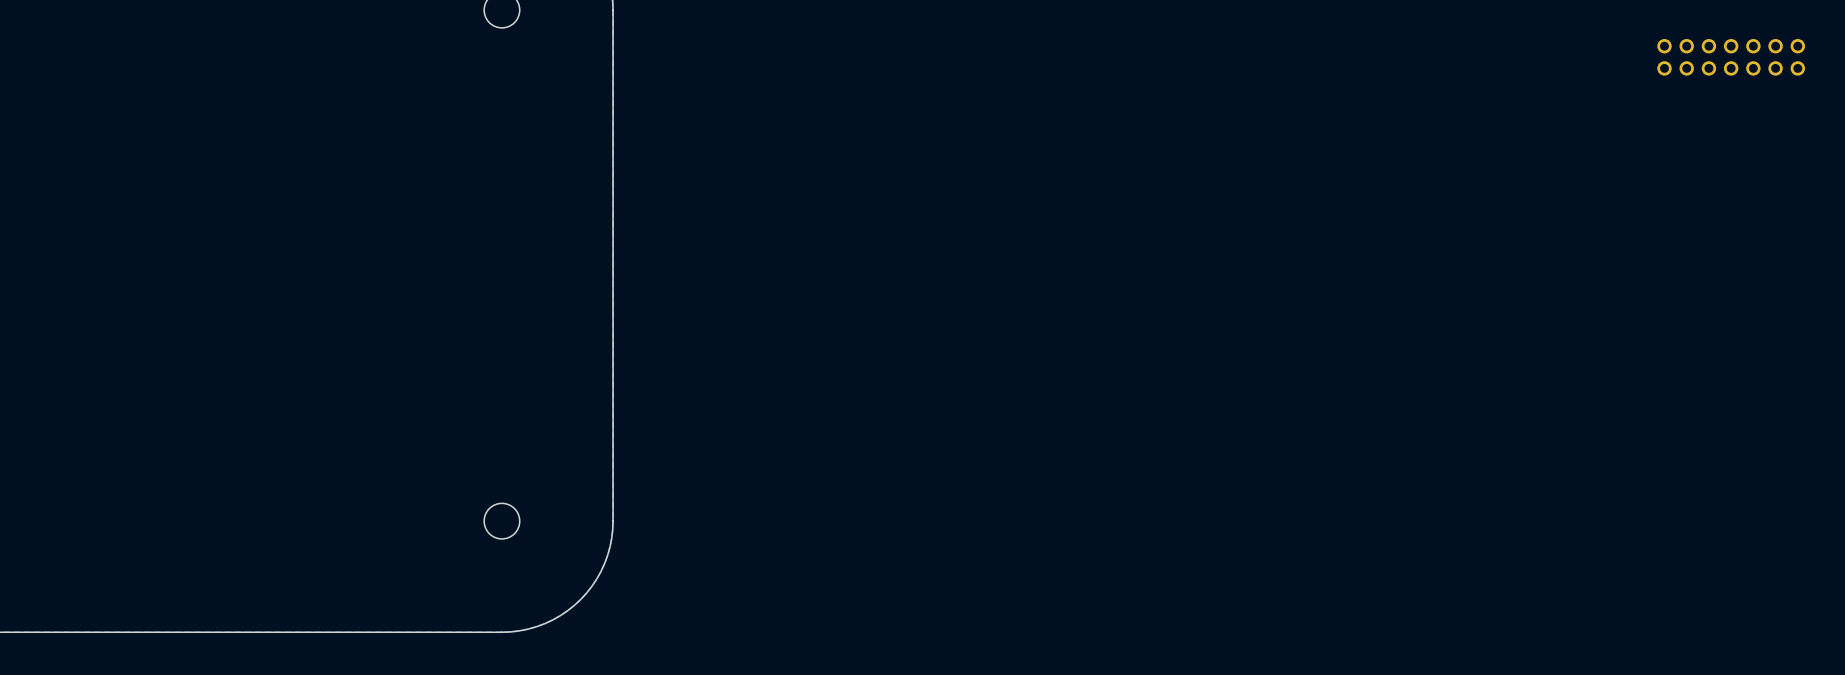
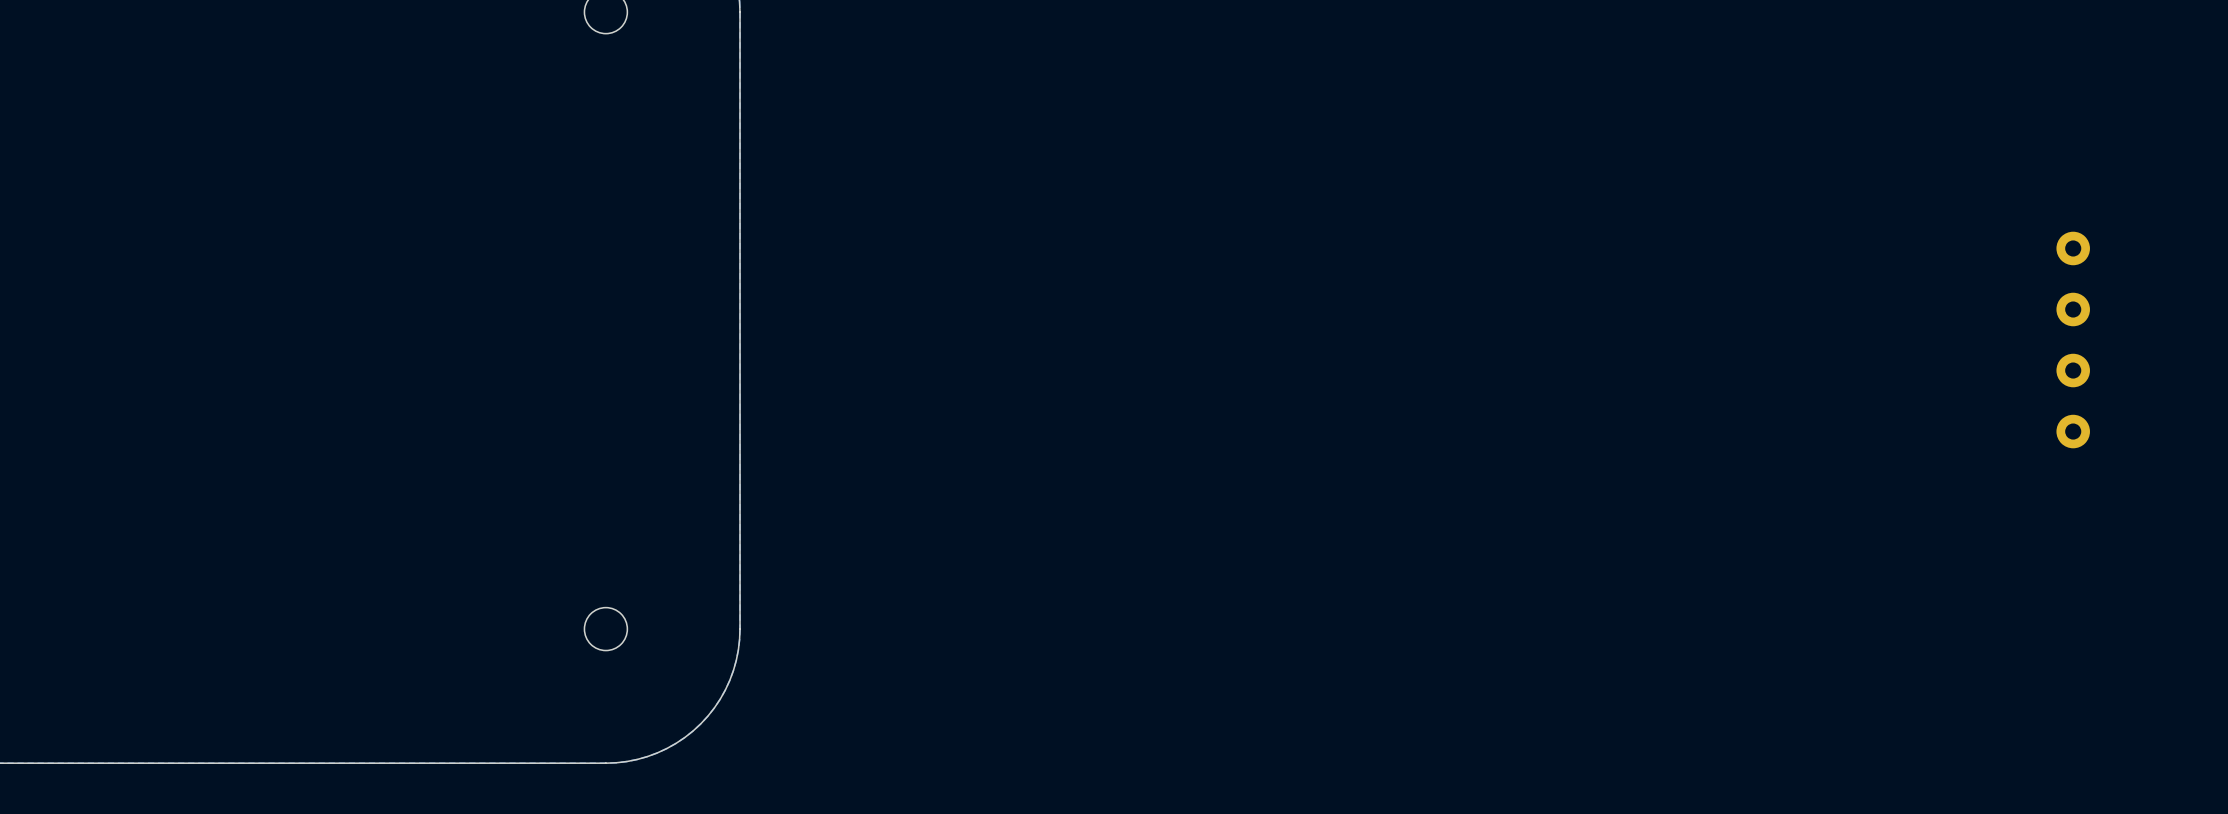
part: (1731, 57) -> none
part: none -> (2073, 248)
part: none -> (2073, 309)
part: none -> (2073, 370)
part: none -> (2073, 431)

